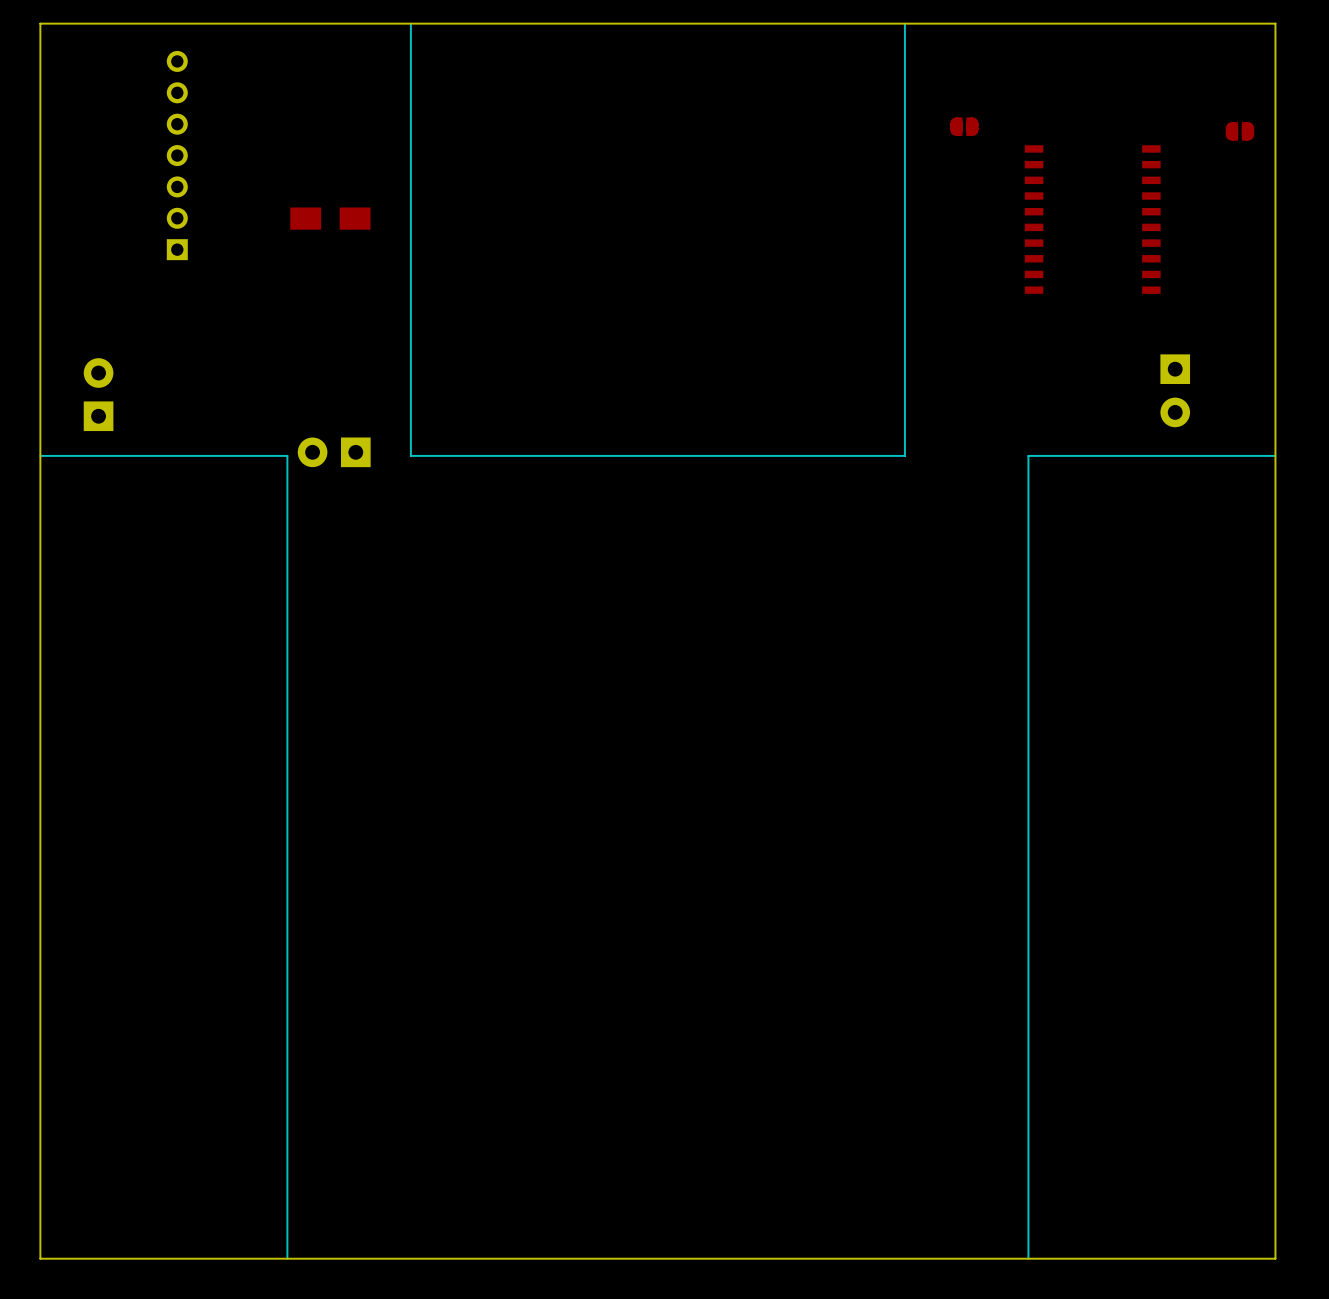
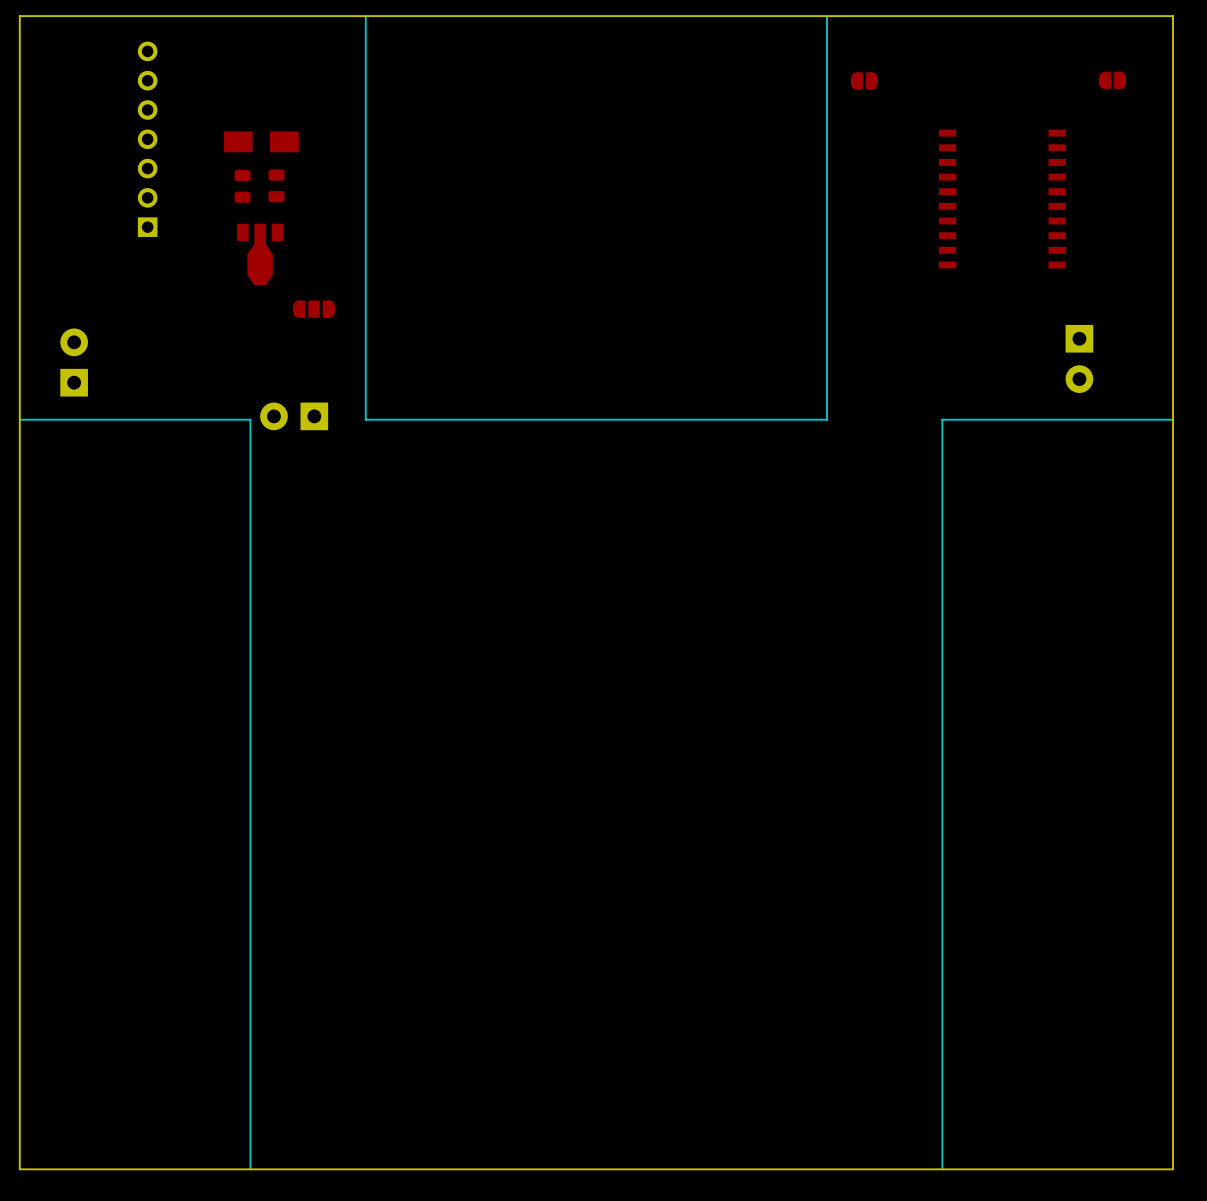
part position: (964, 126) -> (864, 80)
part position: (1239, 131) -> (1112, 80)
part: none -> (276, 185)
part: none -> (242, 186)
part position: (330, 218) -> (261, 141)
part: none -> (260, 254)
part: none -> (314, 309)

